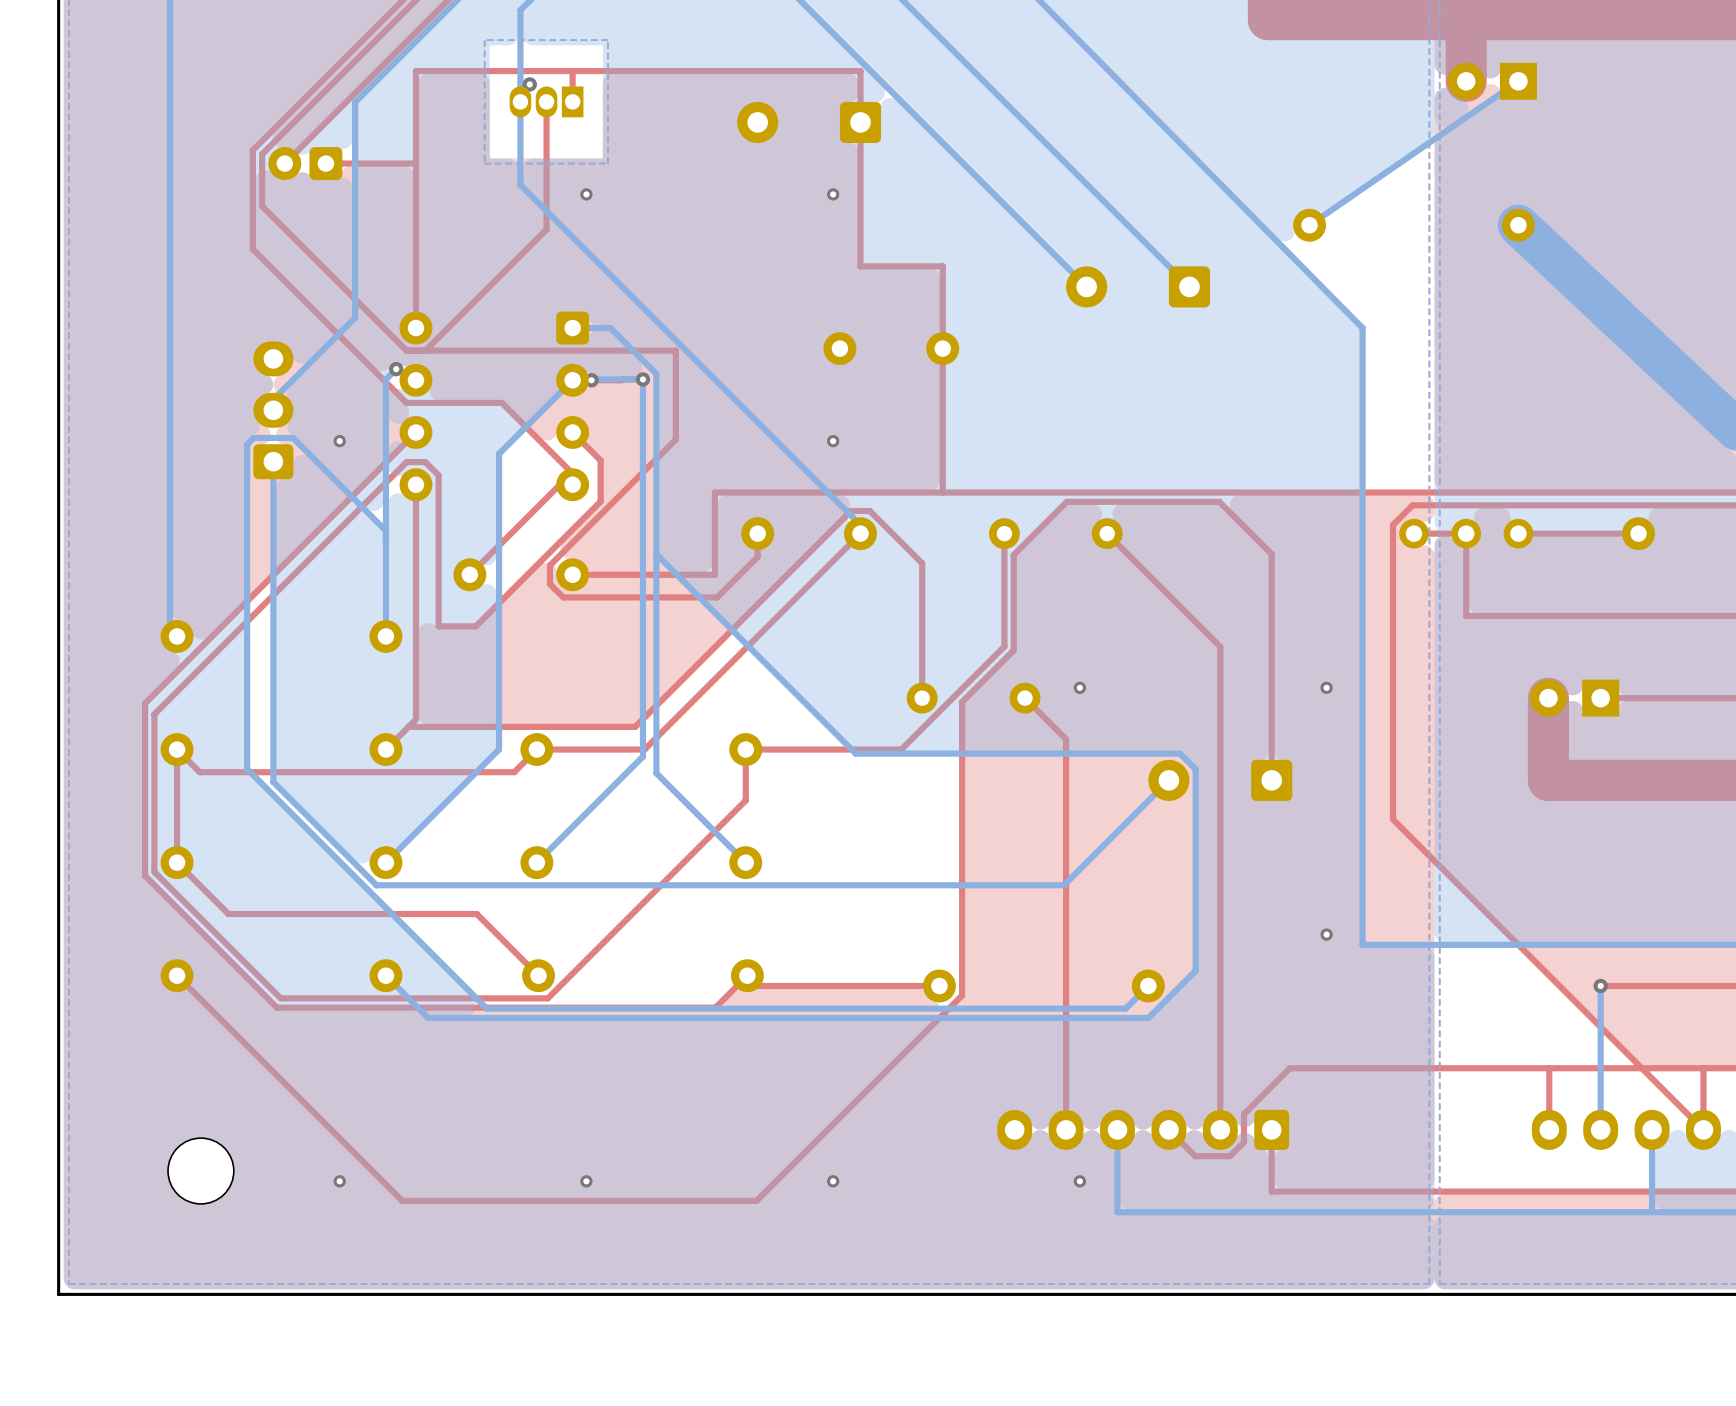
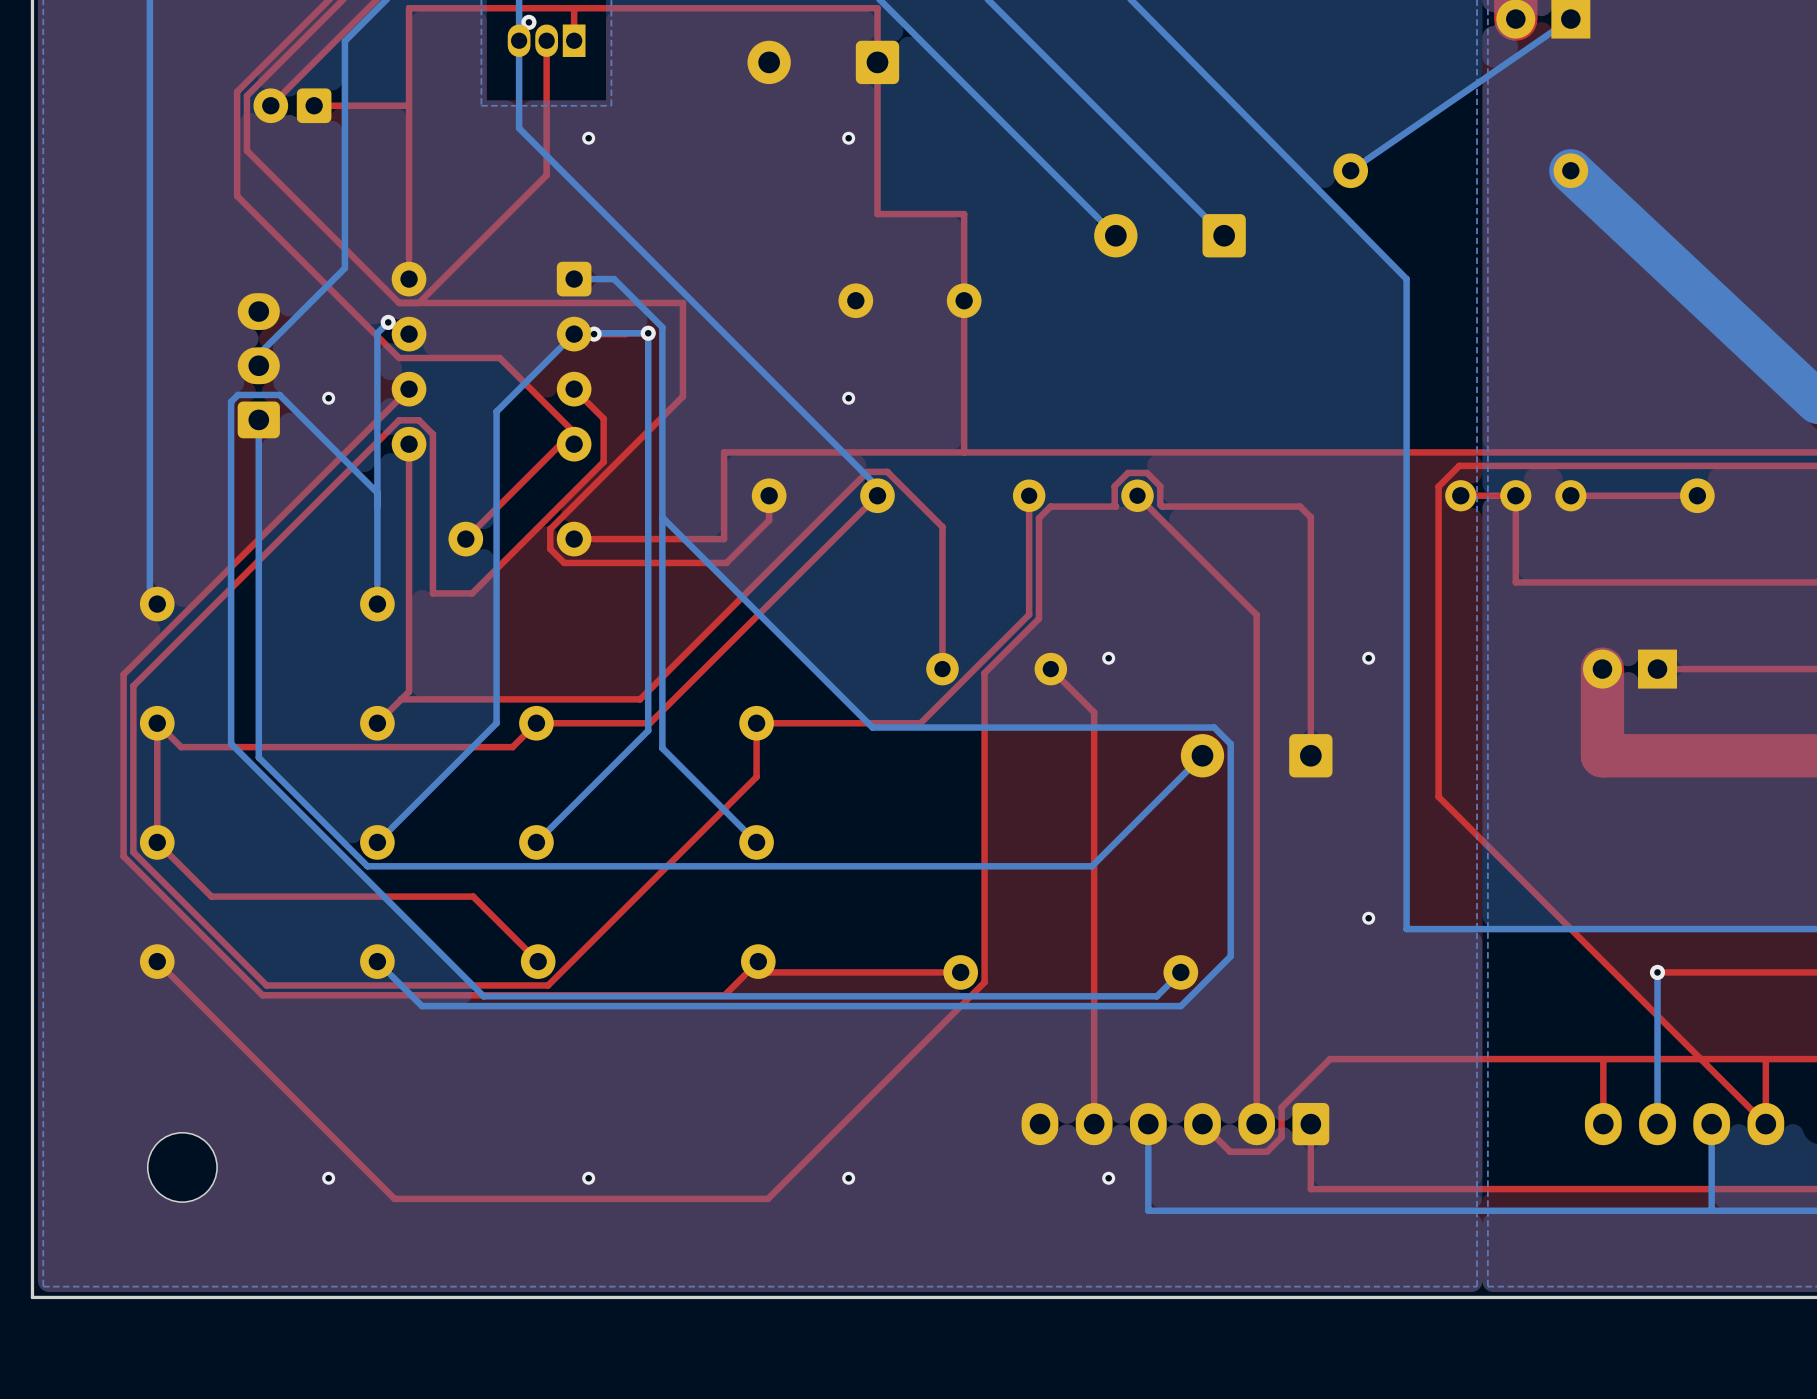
top track: (1261, 543) (1219, 501) (1066, 501) (1024, 543) -> (1300, 506) (1162, 506) (1160, 504) (1160, 486) (1146, 472) (1128, 472) (1114, 486) (1116, 506) (1050, 506)

